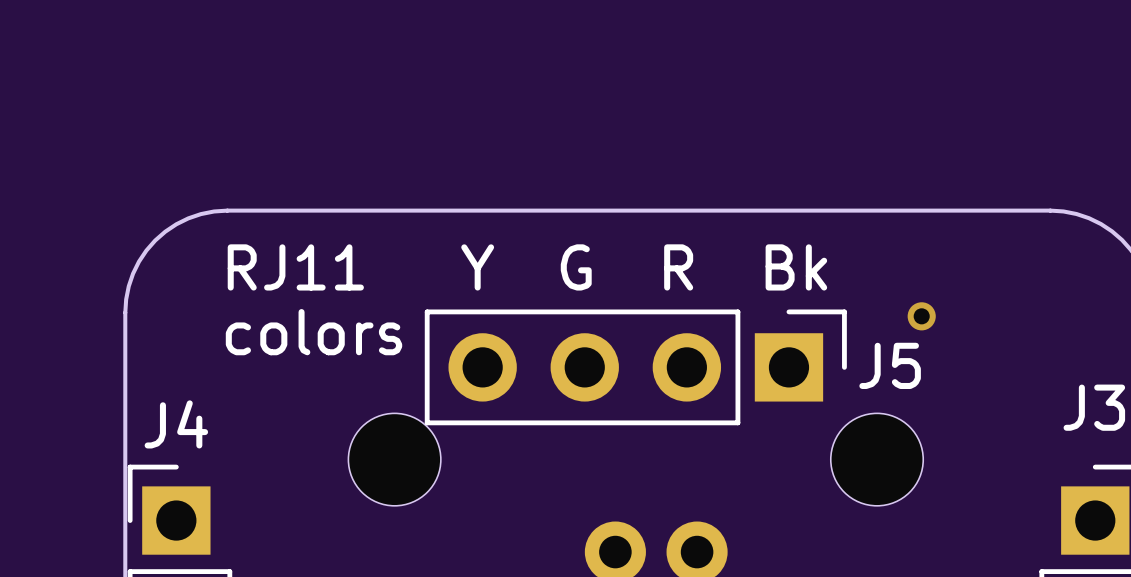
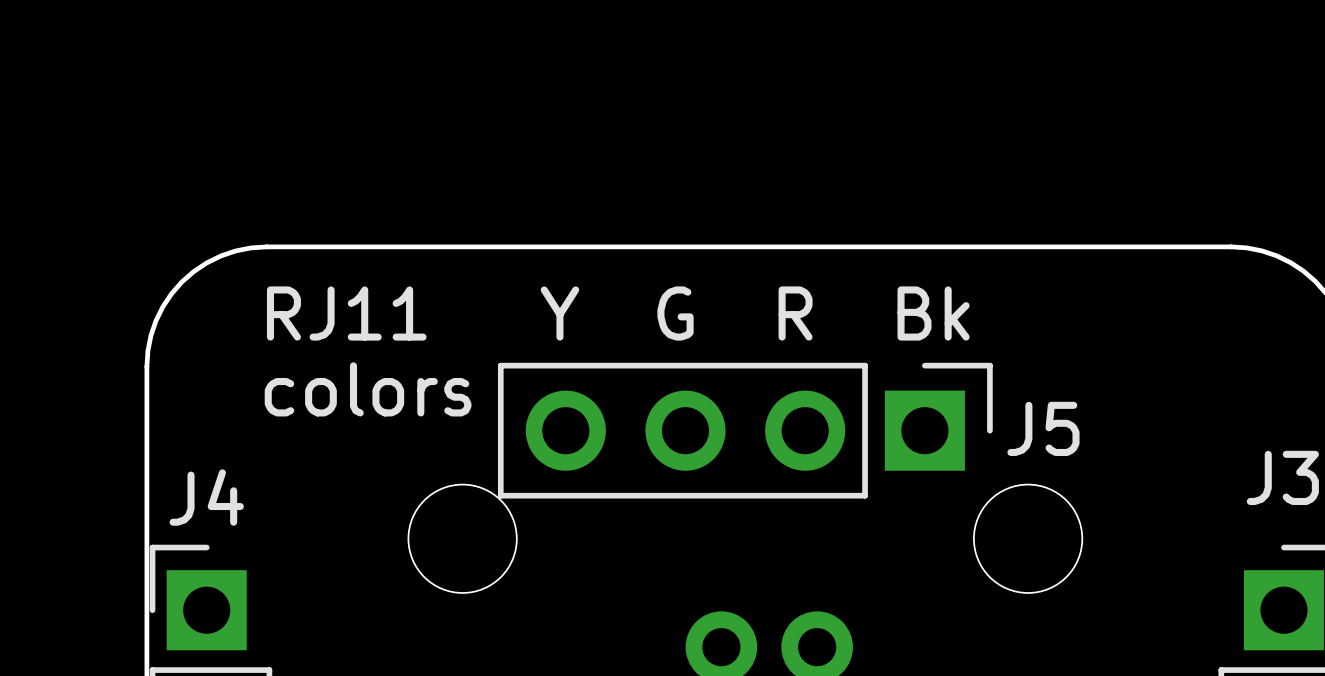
via: (921, 316) -> none

